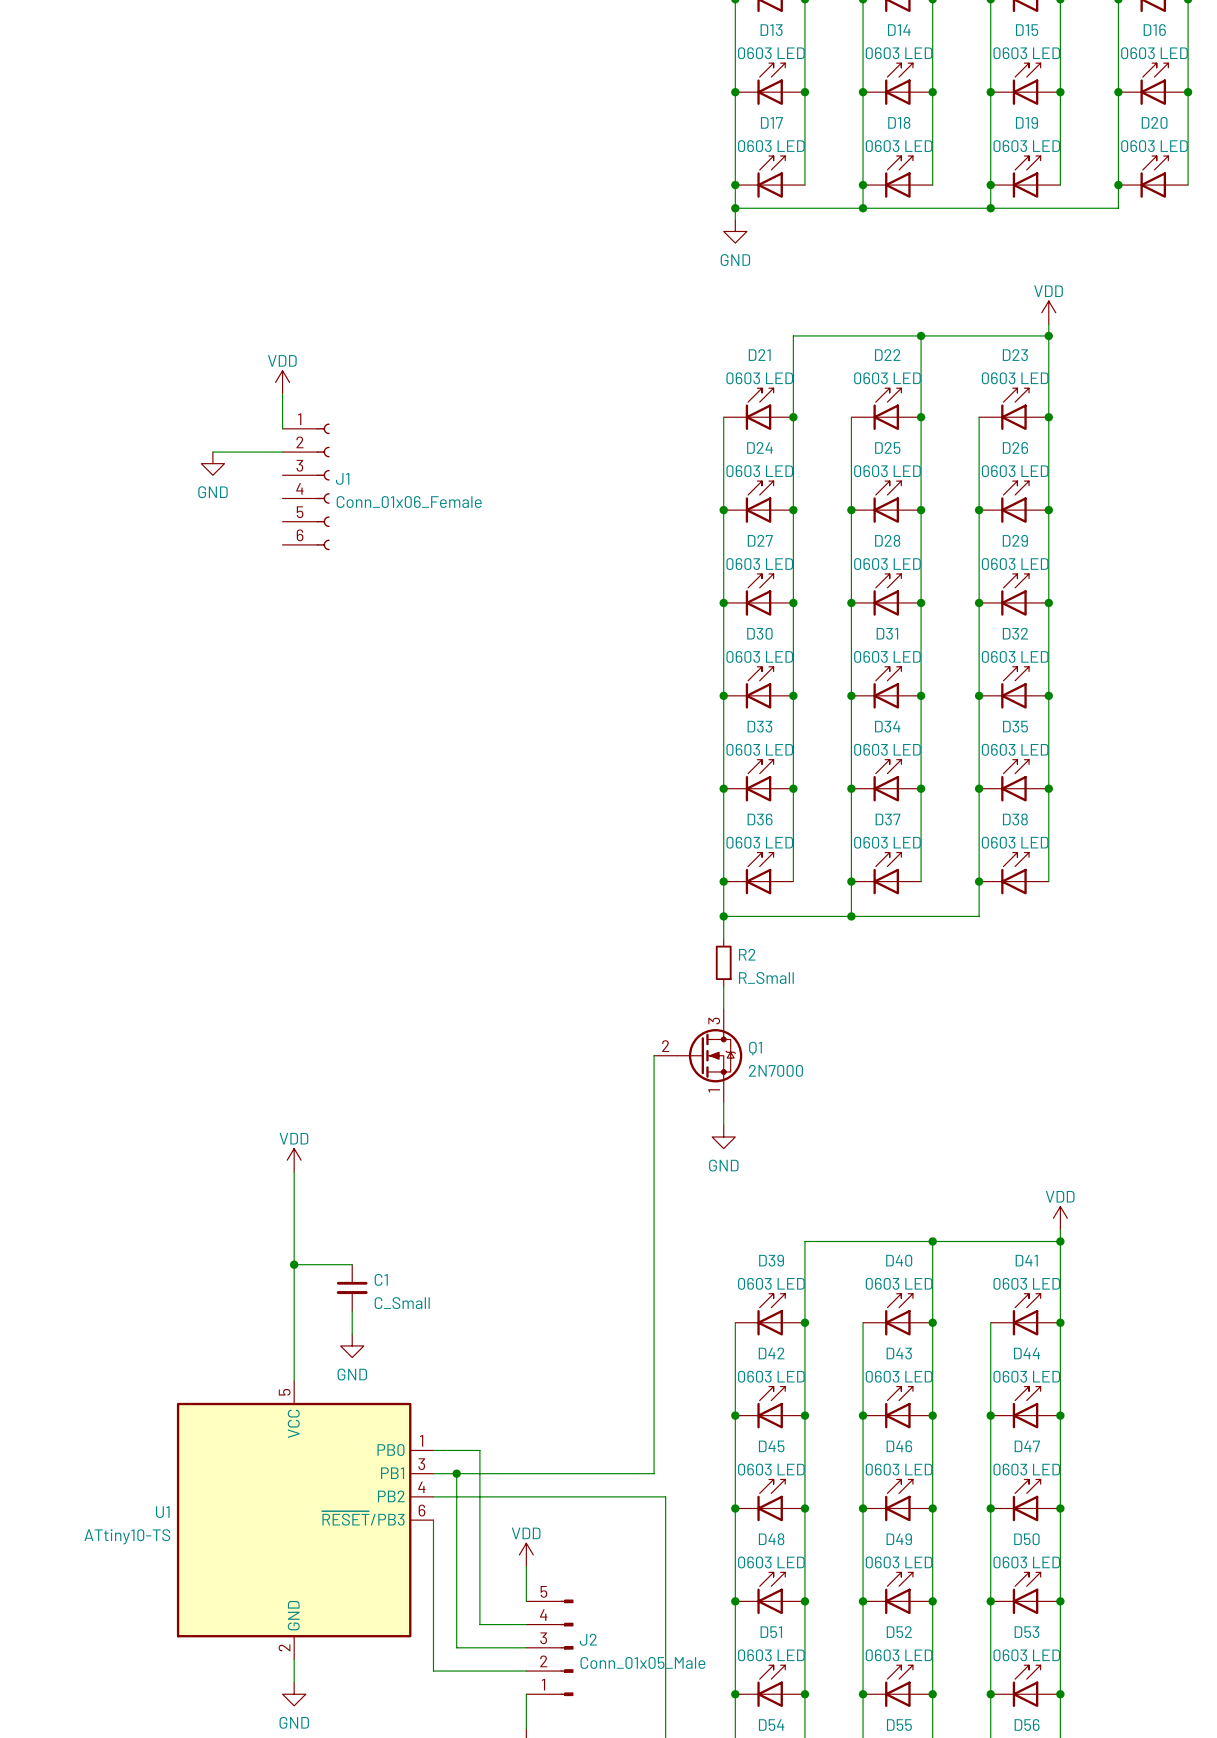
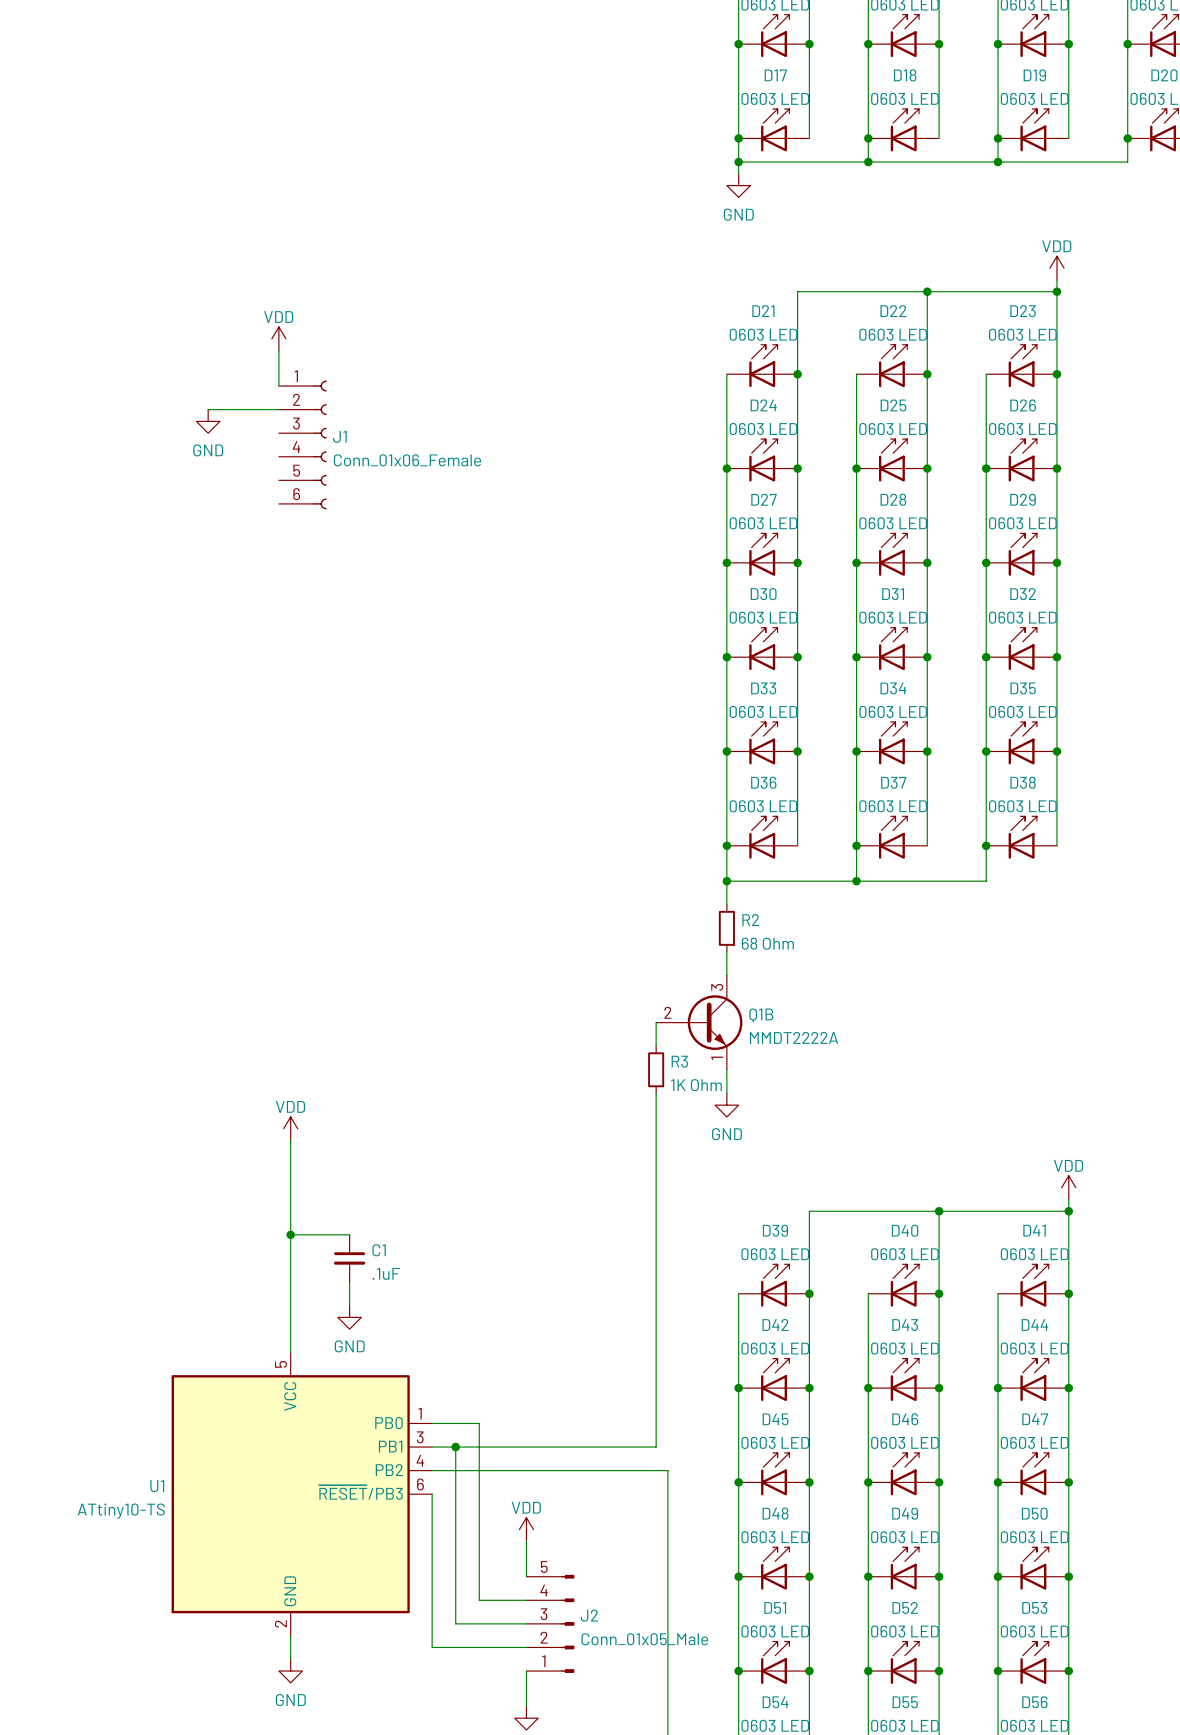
R2 value: R_Small (766, 977) -> 68 Ohm (767, 943)
Q1B: none -> MMDT2222A (699, 1022)
Q1: 2N7000 (698, 1055) -> none
wire: (654, 1078) (654, 1125) -> none
R3: none -> 1K Ohm (656, 1069)
C1 value: C_Small (402, 1303) -> .1uF (386, 1273)

